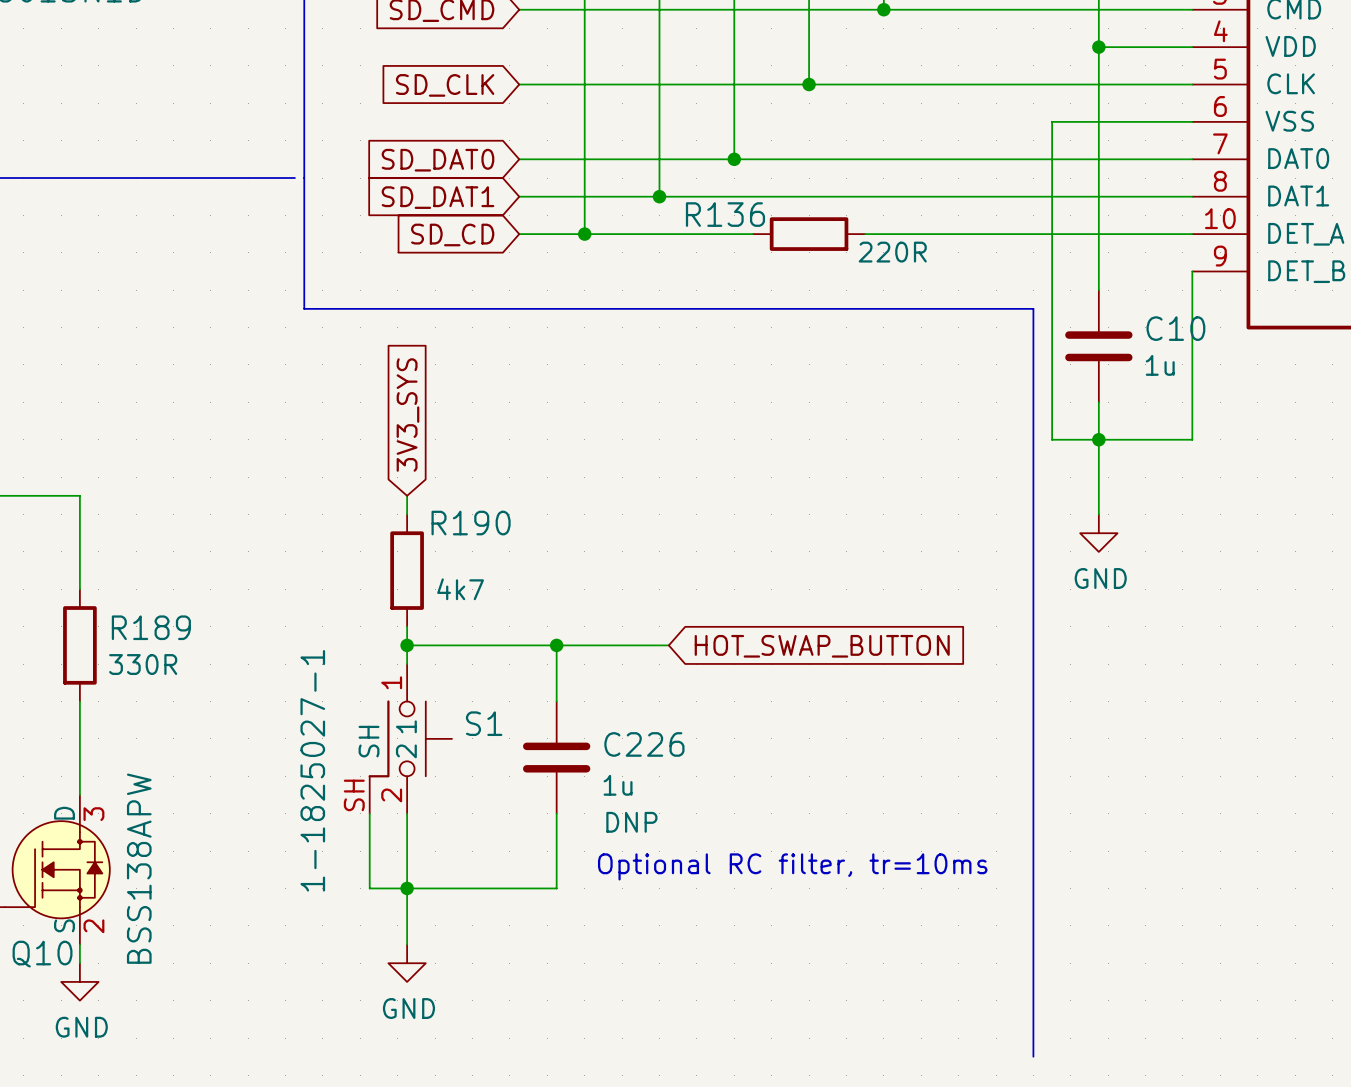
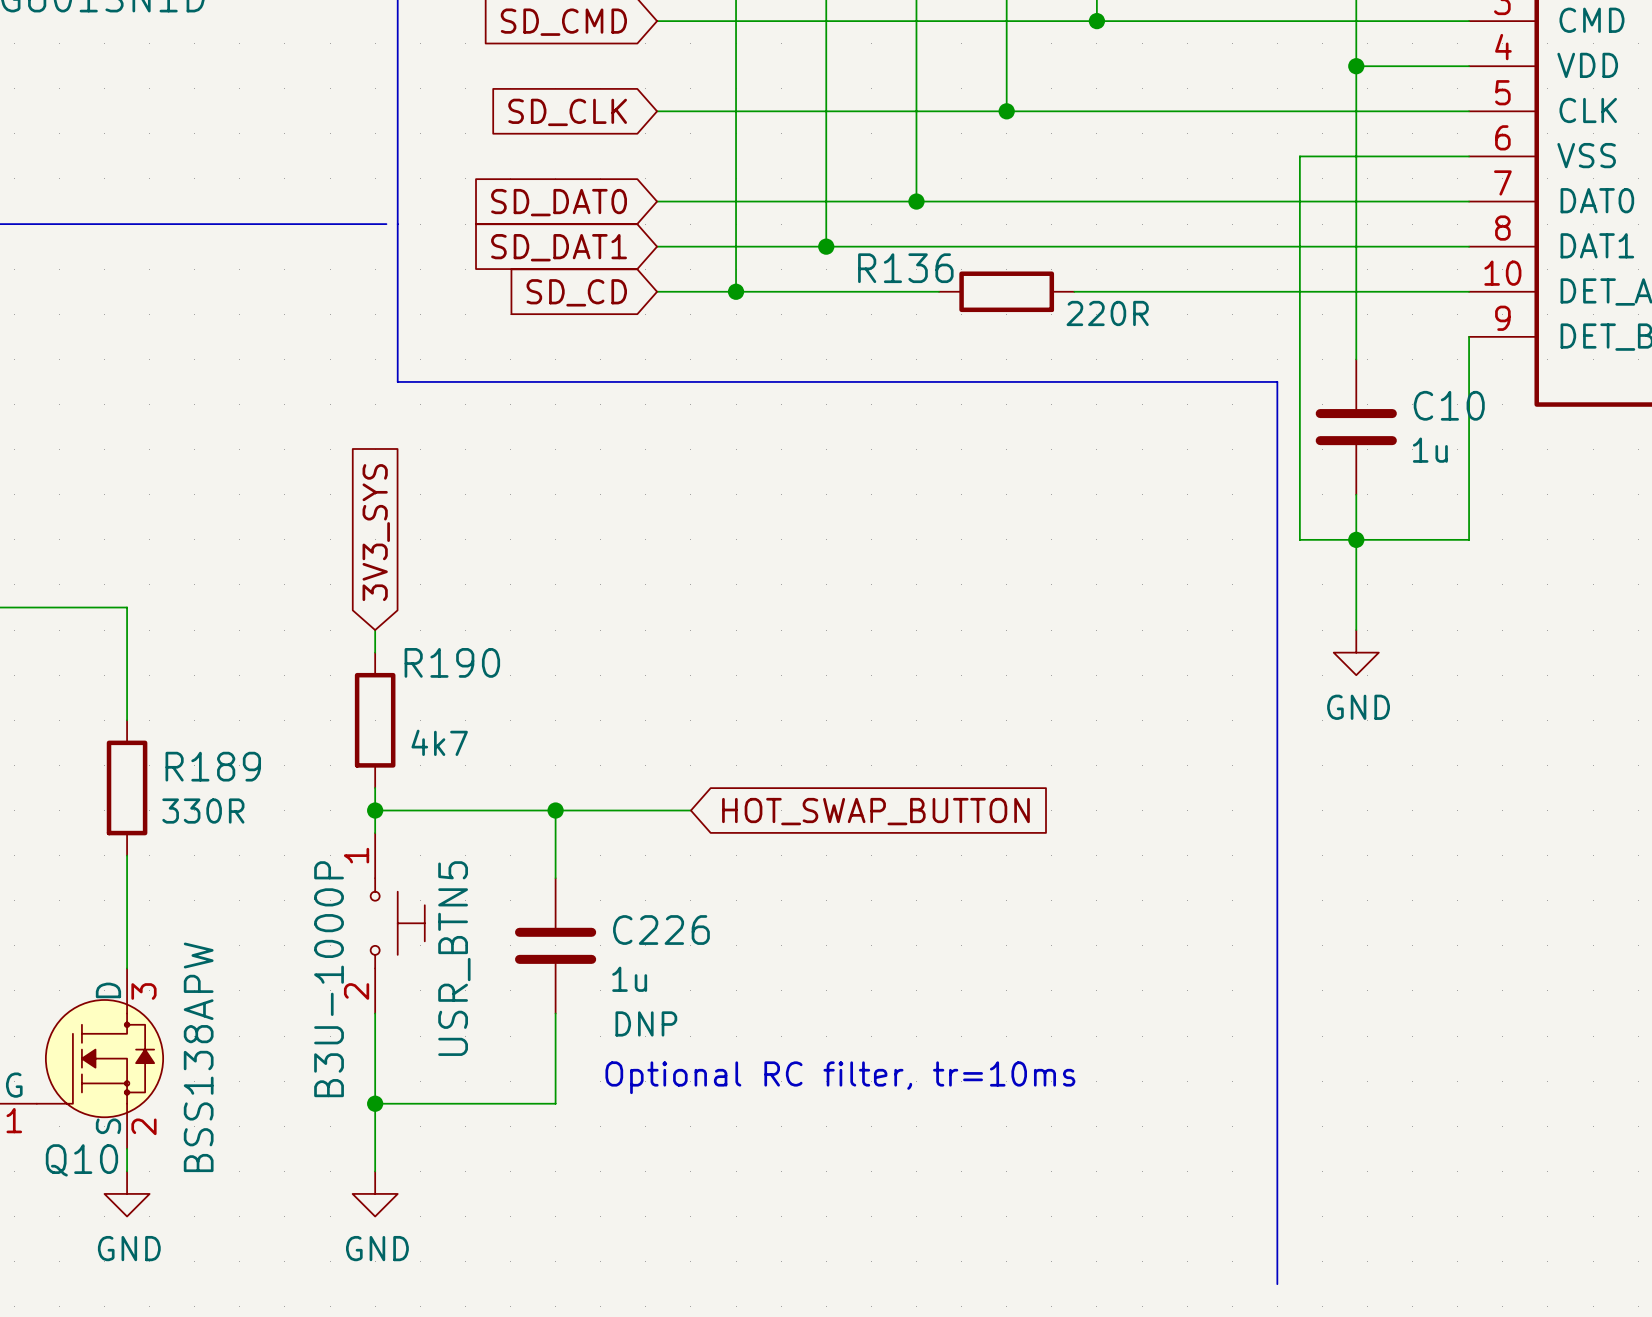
global label position: 3V3_SYS (407, 415) -> 3V3_SYS (376, 532)
wire: (407, 495) (407, 514) -> (375, 630) (375, 652)
R190 position: (407, 570) -> (375, 720)
wire: (407, 626) (407, 664) -> (375, 787) (375, 833)
wire: (407, 645) (668, 645) -> (375, 810) (690, 810)
junction position: (407, 645) -> (555, 810)
wire: (556, 645) (556, 701) -> (555, 810) (555, 878)
junction: (556, 645) -> none
global label position: HOT_SWAP_BUTTON (822, 646) -> HOT_SWAP_BUTTON (875, 811)
junction: none -> (375, 810)
S1: 1-1825027-1 (410, 738) -> none
USR_BTN5: none -> B3U-1000P (397, 923)
C226 position: (556, 757) -> (555, 945)
wire: (369, 813) (369, 888) (556, 888) (556, 813) -> none
wire: (407, 813) (407, 944) -> (375, 1013) (375, 1171)
wire: none -> (555, 1013) (555, 1103) (375, 1103)
text position: Optional RC filter, tr=10ms (792, 866) -> Optional RC filter, tr=10ms (840, 1077)
junction: (407, 888) -> none
junction: none -> (375, 1103)
power symbol position: GND (407, 963) -> GND (375, 1193)

